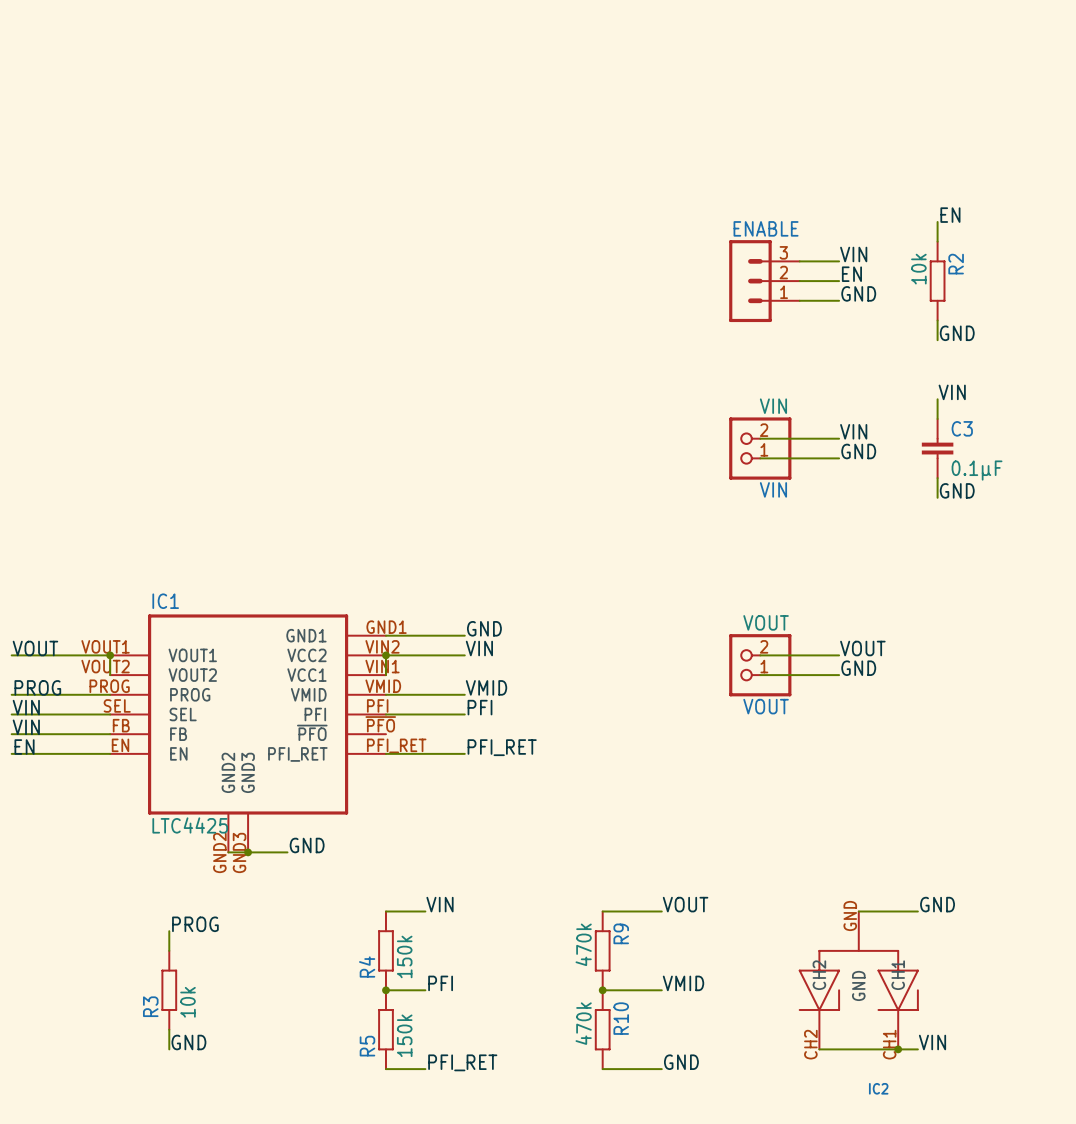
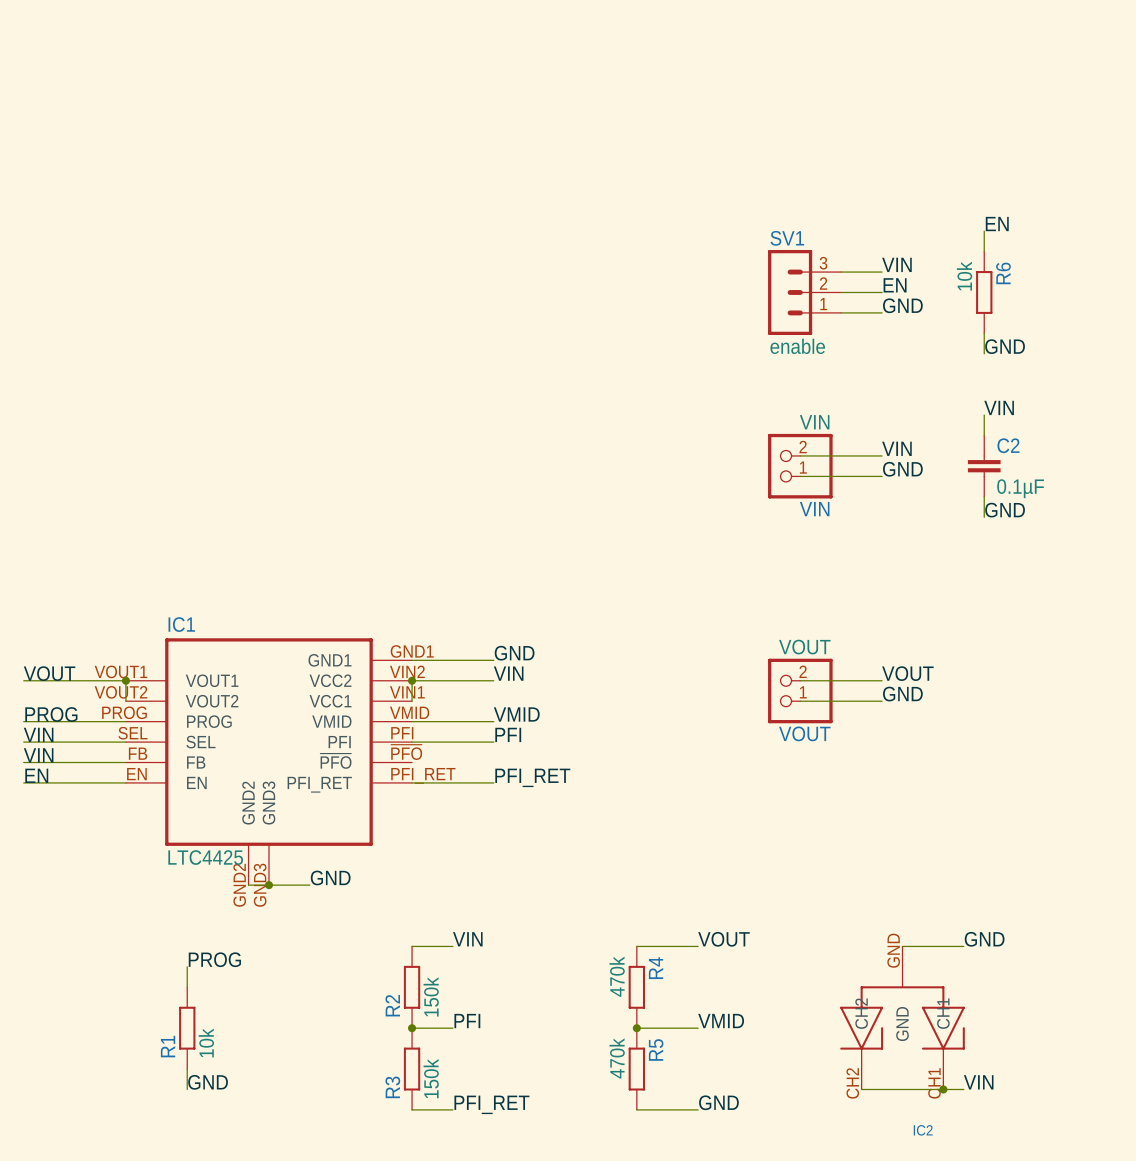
ENABLE name: ENABLE (766, 228) -> SV1 (787, 238)
R2 name: R2 (956, 264) -> R6 (1003, 273)
ENABLE value: none -> enable (797, 346)
C3 name: C3 (962, 428) -> C2 (1008, 445)
R9 name: R9 (621, 933) -> R4 (656, 968)
R4 name: R4 (367, 967) -> R2 (392, 1005)
R3 name: R3 (150, 1006) -> R1 (168, 1046)
R10 name: R10 (621, 1018) -> R5 (656, 1049)
R5 name: R5 (367, 1046) -> R3 (392, 1087)

